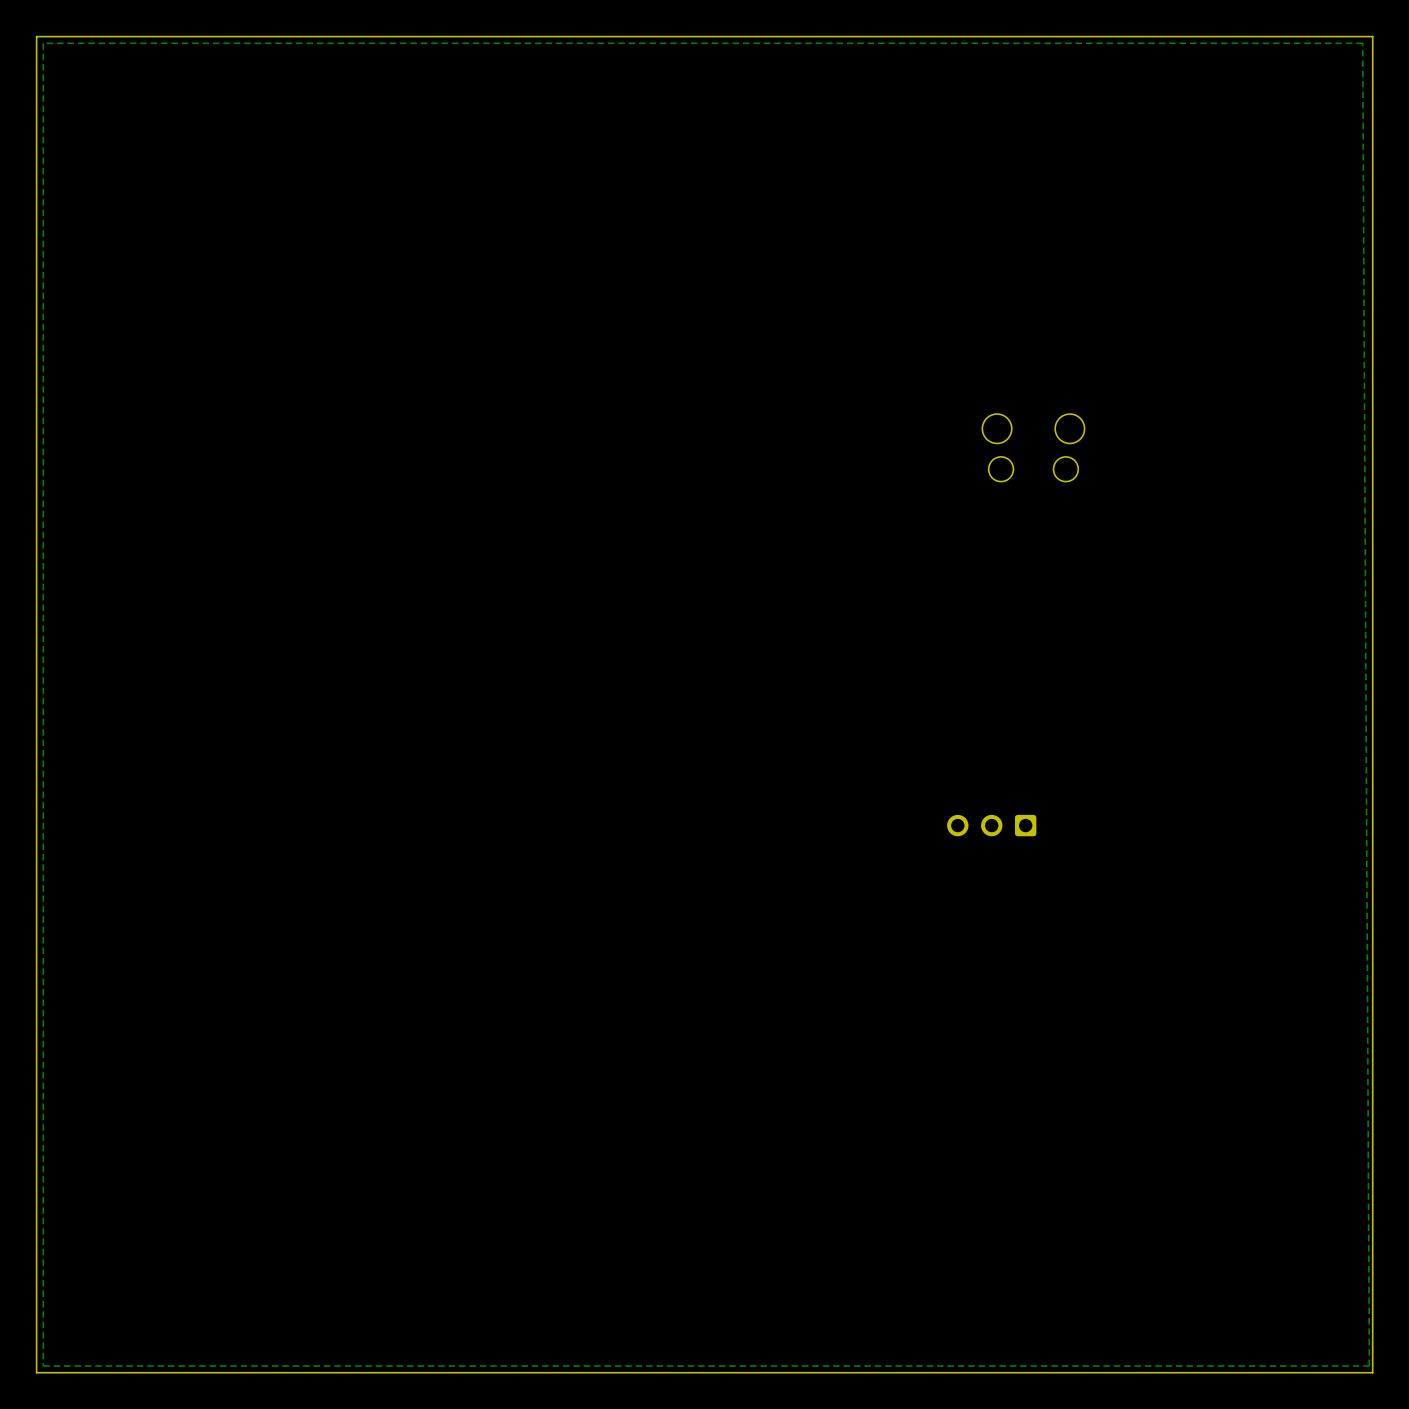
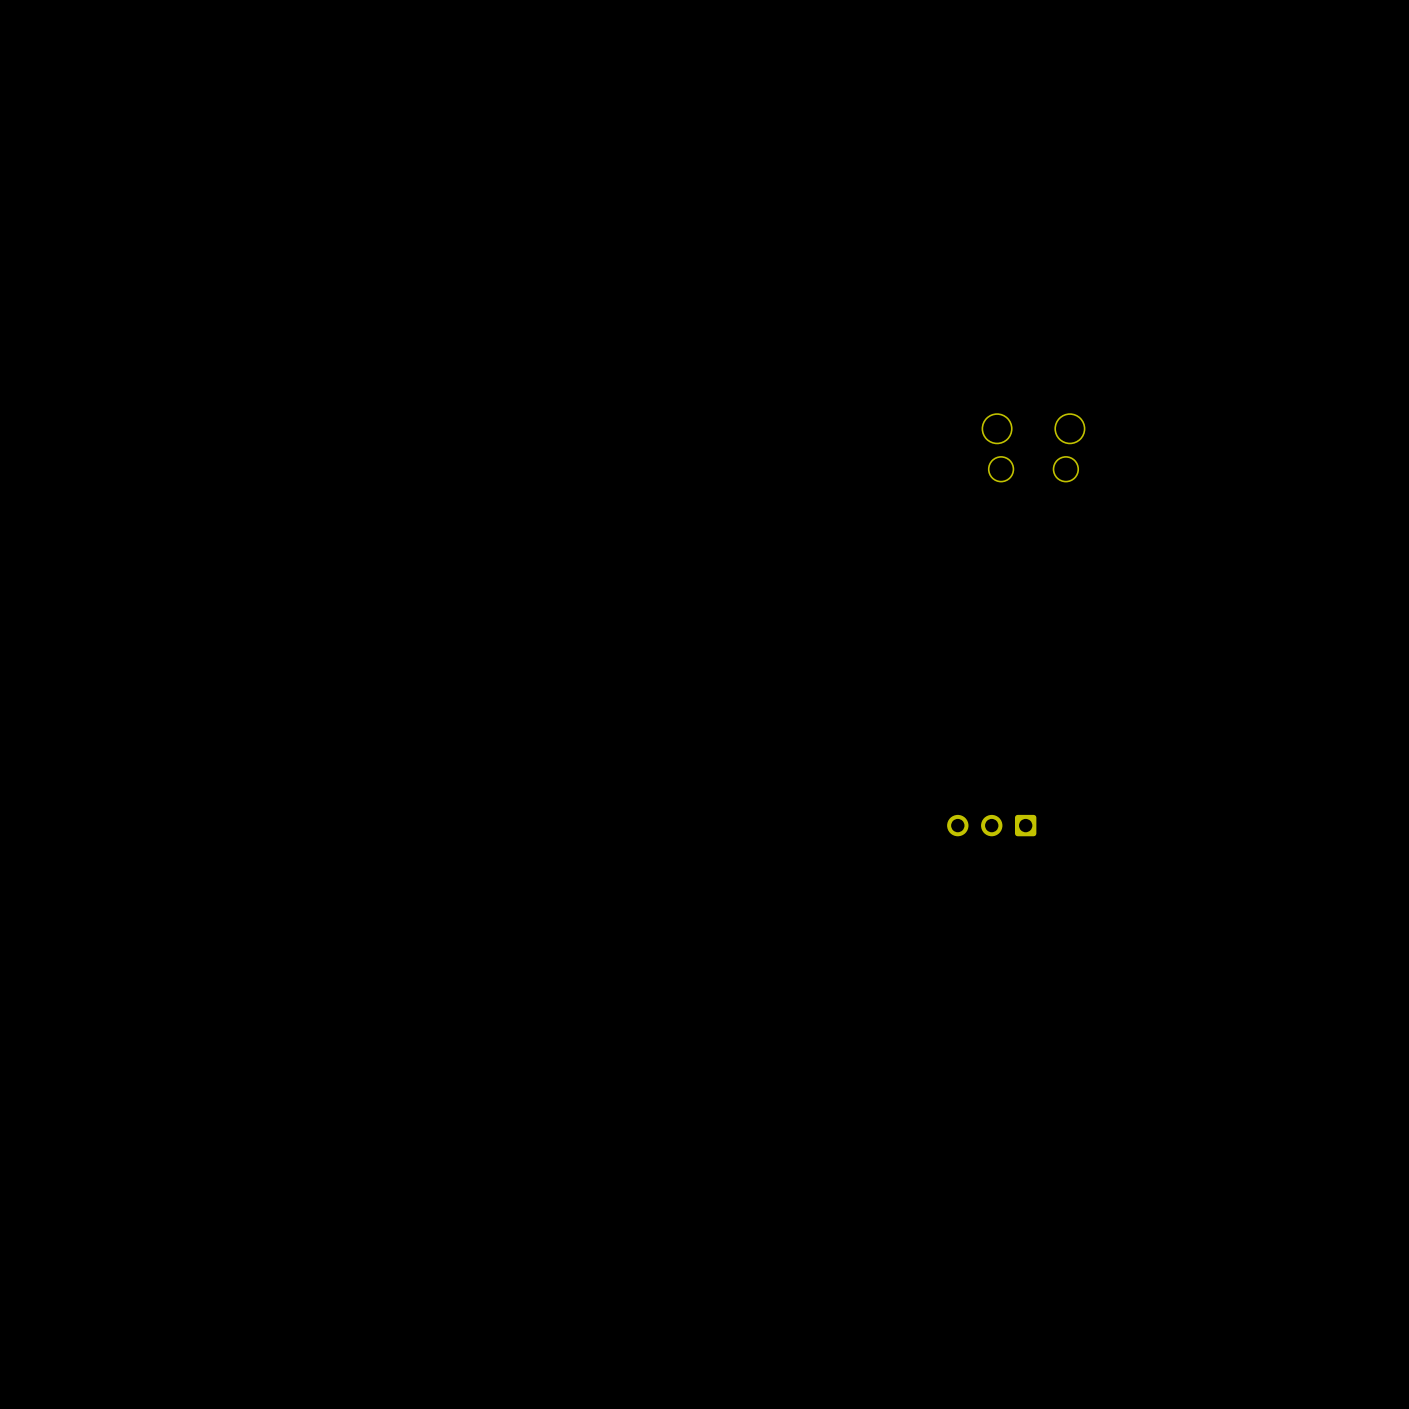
board edge: (1372, 36) (1372, 1372) (36, 1372) (36, 36) (1372, 36) -> none
zone outline: (1362, 43) (1369, 1366) (43, 1366) (43, 43) (1362, 43) -> none

